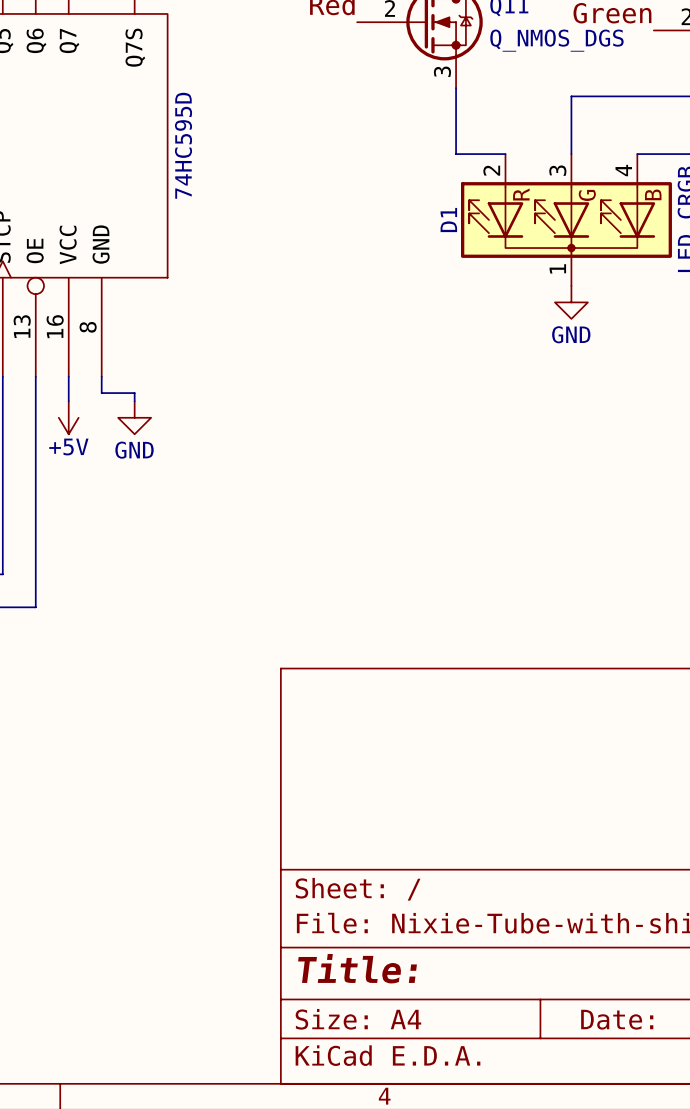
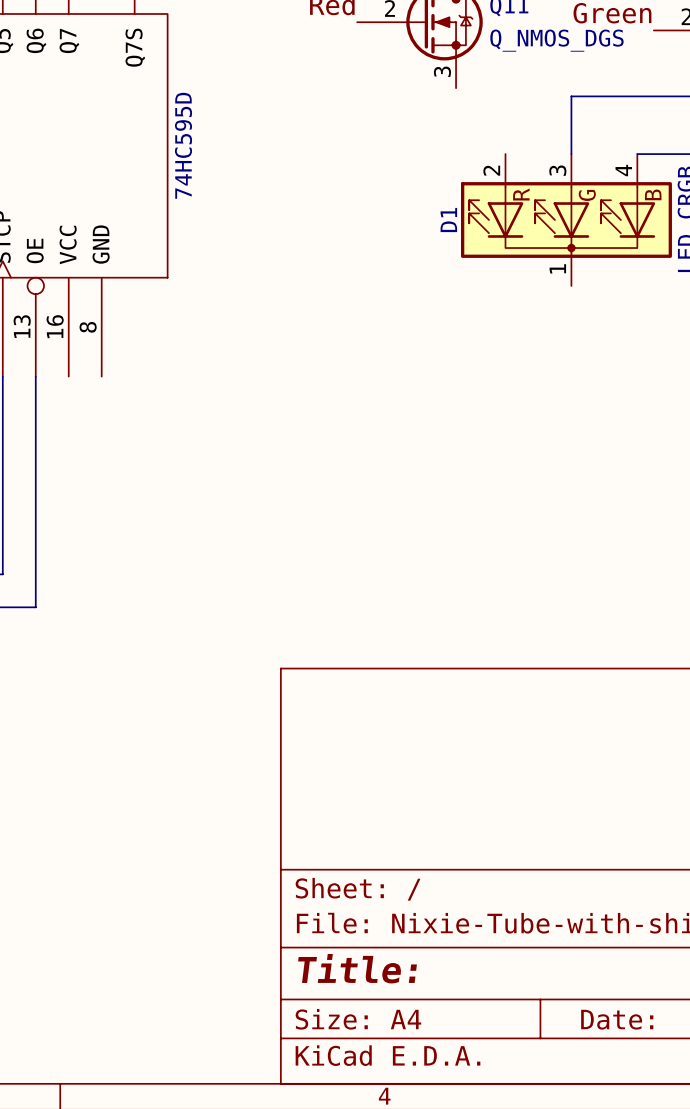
wire: (456, 88) (456, 154) (505, 154) -> none
power symbol: GND (571, 302) -> none
wire: (68, 376) (68, 401) -> none
wire: (101, 376) (101, 393) (134, 393) (134, 401) -> none
power symbol: +5V (68, 417) -> none
power symbol: GND (134, 417) -> none

